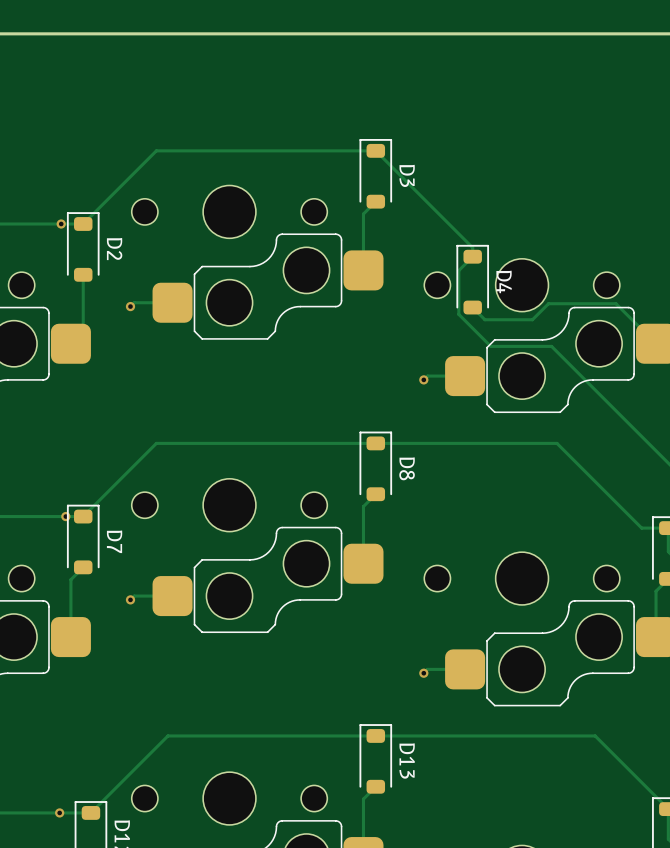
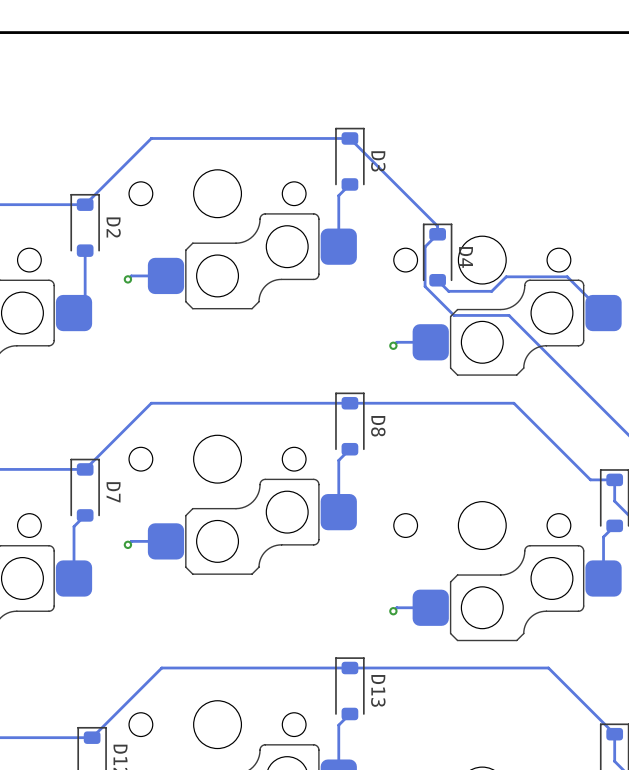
via: (61, 223) -> none
via: (65, 516) -> none
via: (59, 812) -> none

